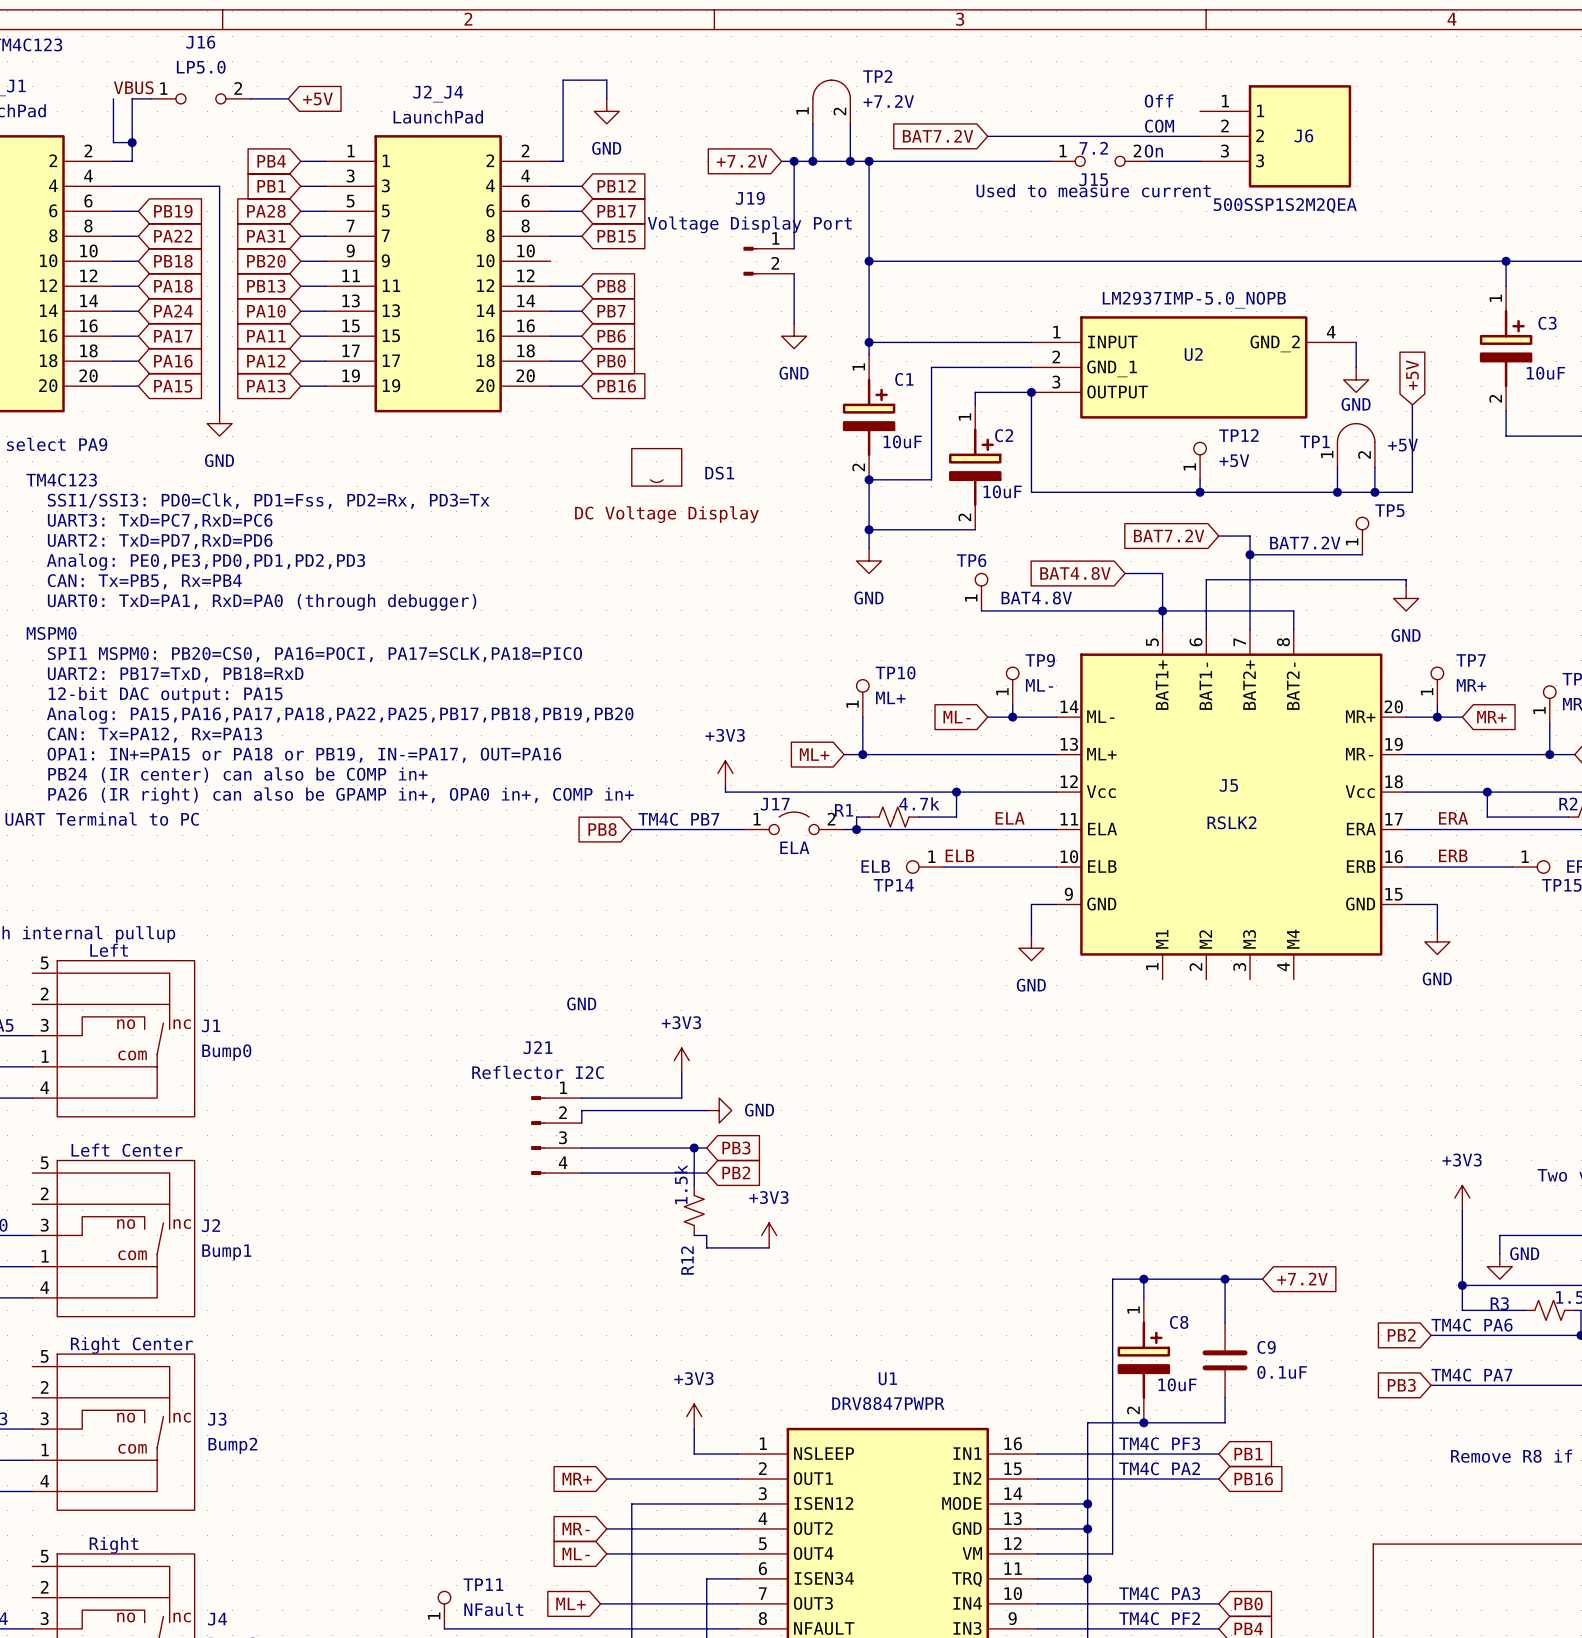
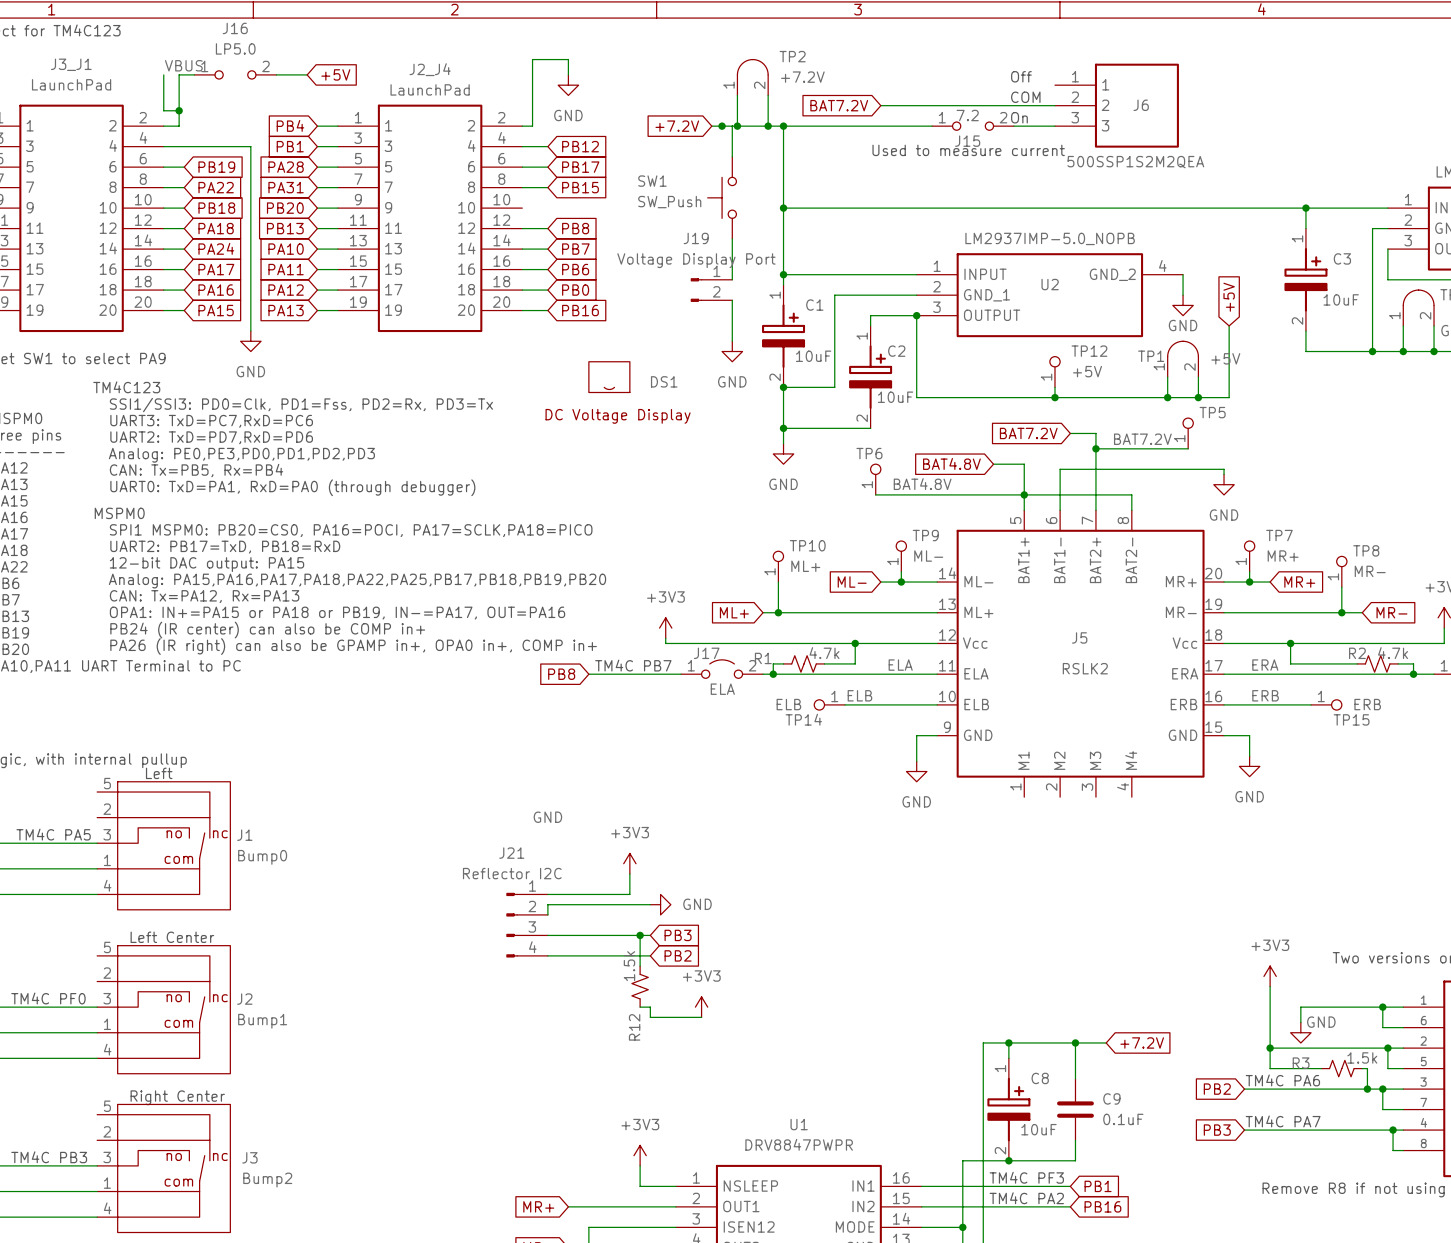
wire: (794, 161) (794, 248) -> none
wire: none -> (732, 126) (732, 156)
SW1: none -> SW_Push (722, 197)
J19 position: (768, 261) -> (711, 290)
wire: (794, 273) (794, 323) -> (732, 238) (732, 279)
power symbol position: GND (794, 336) -> GND (732, 351)
wire: none -> (732, 300) (732, 341)

